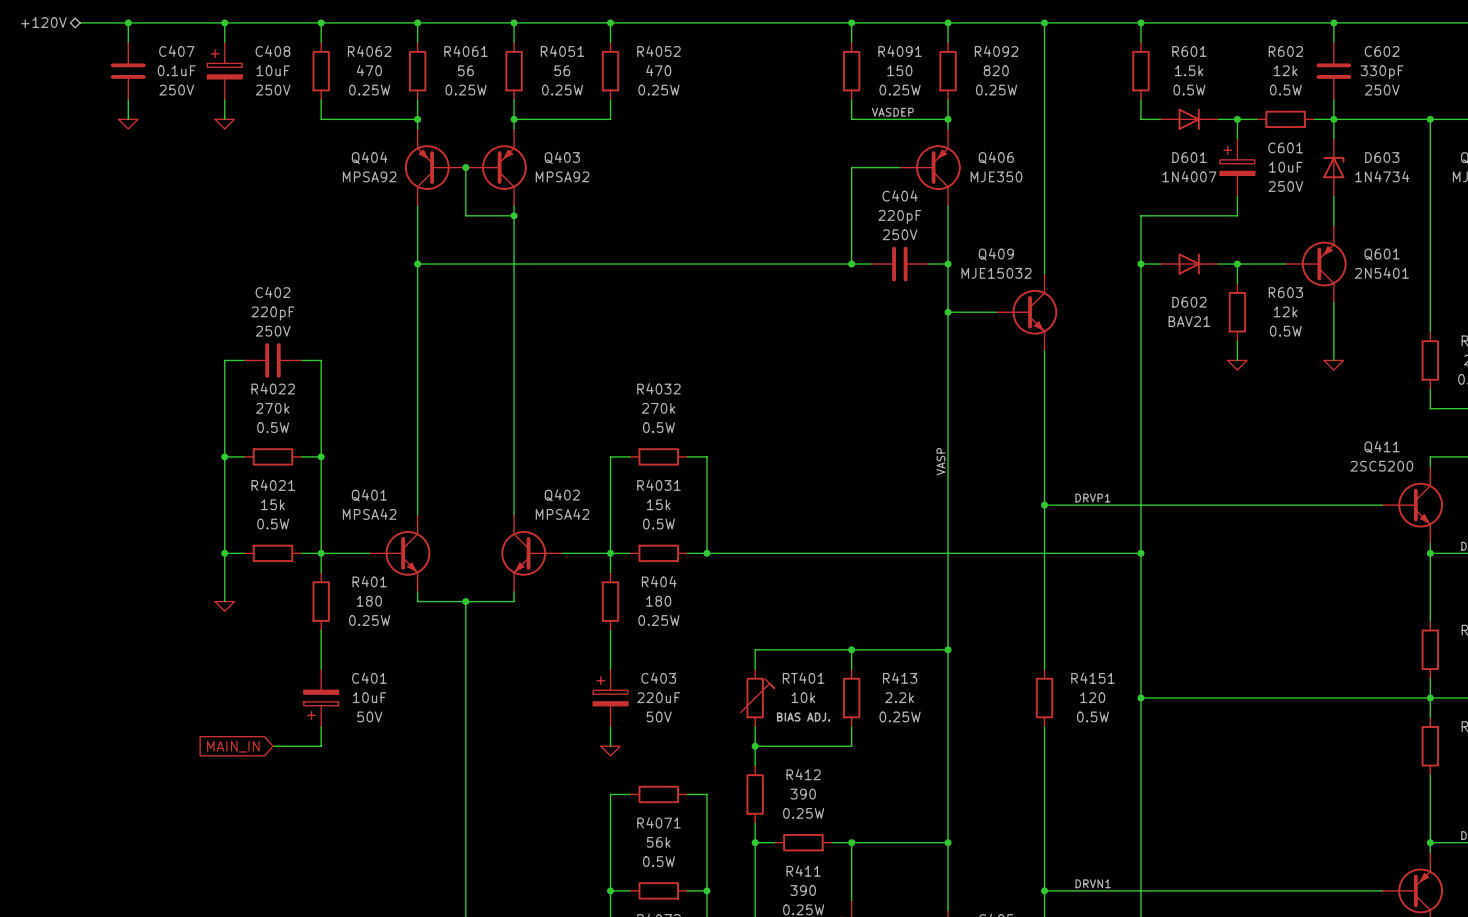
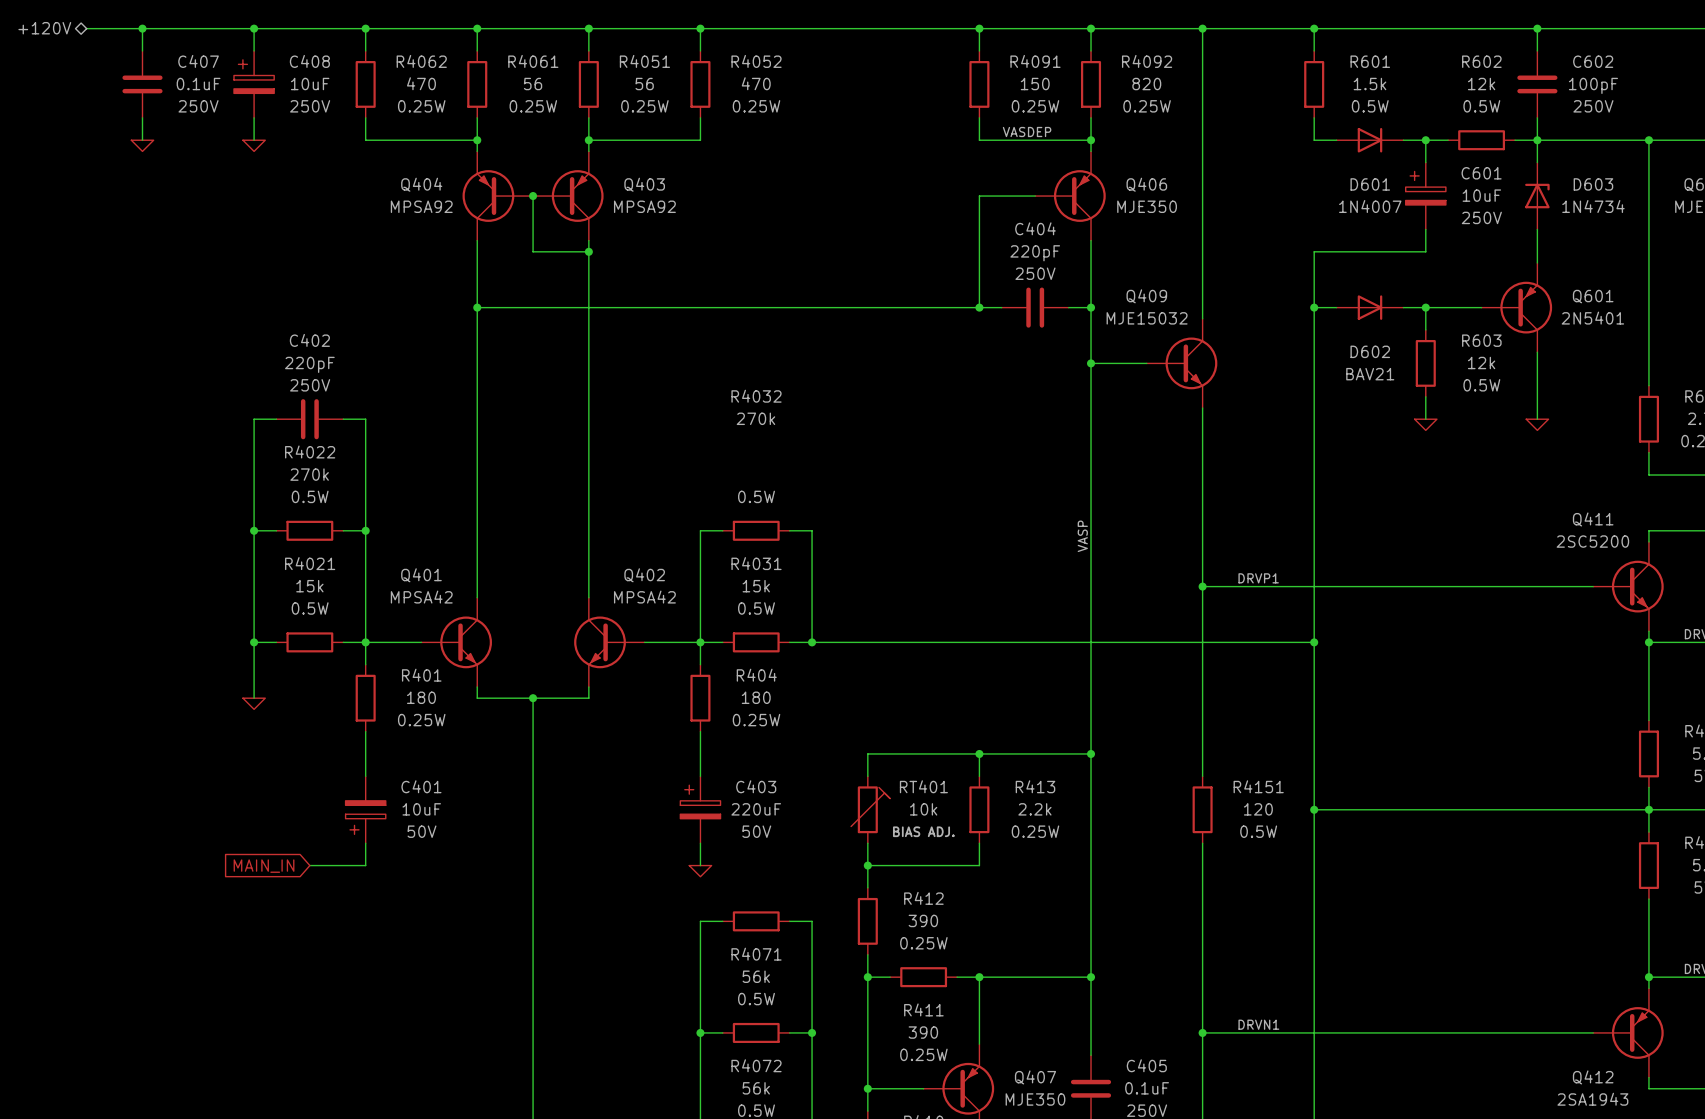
C602 value: 330pF (1382, 72) -> 100pF (1593, 85)
R4032 name position: R4032 (658, 388) -> R4032 (756, 396)
R4032 value position: 270k (658, 408) -> 270k (755, 418)

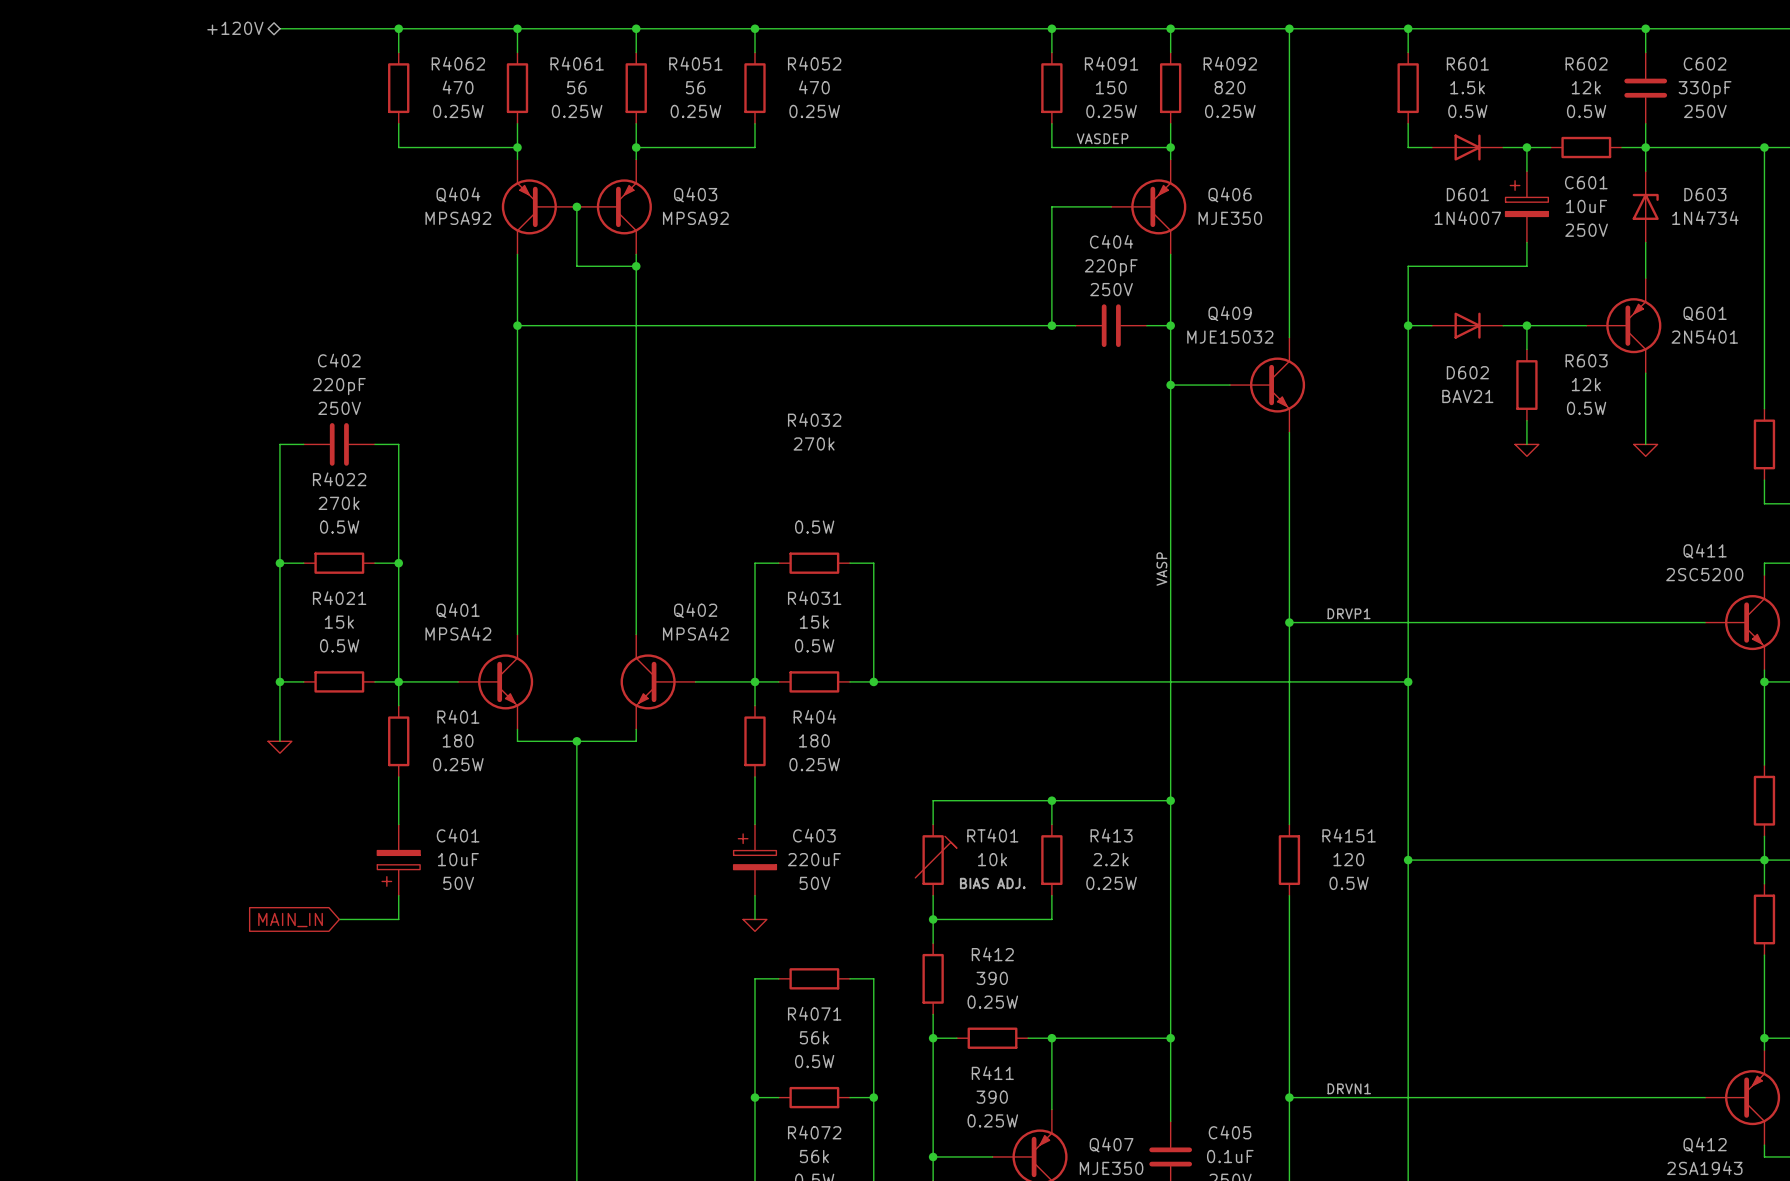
hierarchical label position: +120V (44, 28) -> +120V (235, 28)
wire: (86, 28) (254, 28) (254, 50) -> none
wire: (142, 28) (142, 50) -> none
junction: (142, 28) -> none
junction: (254, 28) -> none
C407: 0.1uF (142, 84) -> none
C408: 10uF (254, 84) -> none
C602 value: 100pF (1593, 85) -> 330pF (1705, 89)
wire: (142, 117) (142, 140) -> none
wire: (254, 117) (254, 140) -> none
power symbol: (142, 145) -> none
power symbol: (254, 145) -> none

